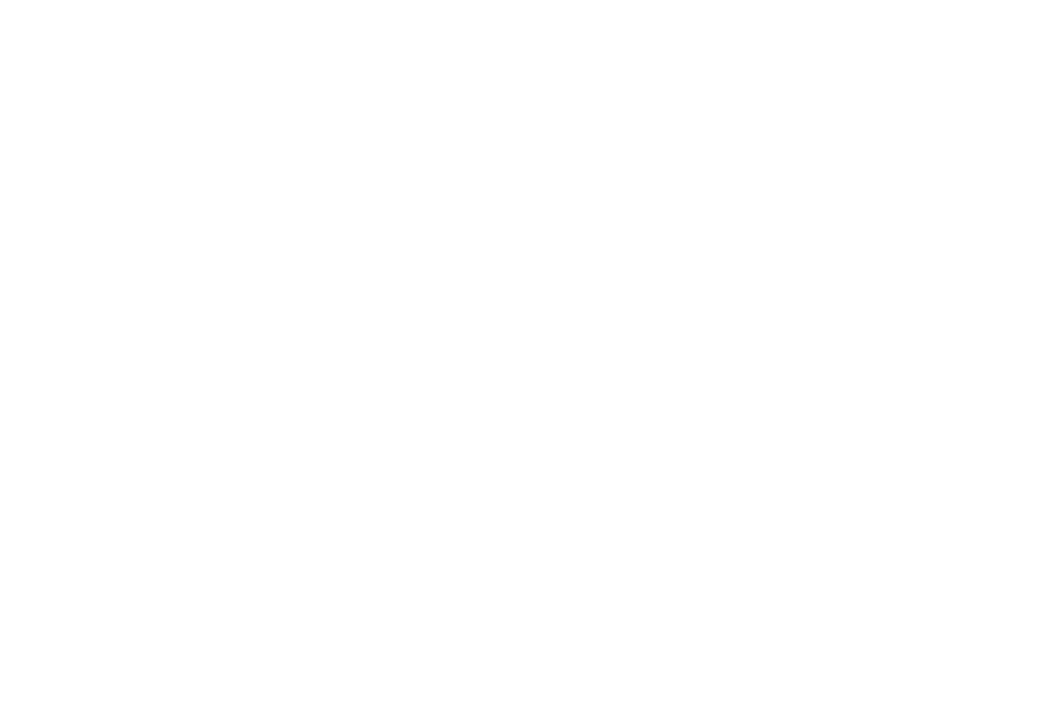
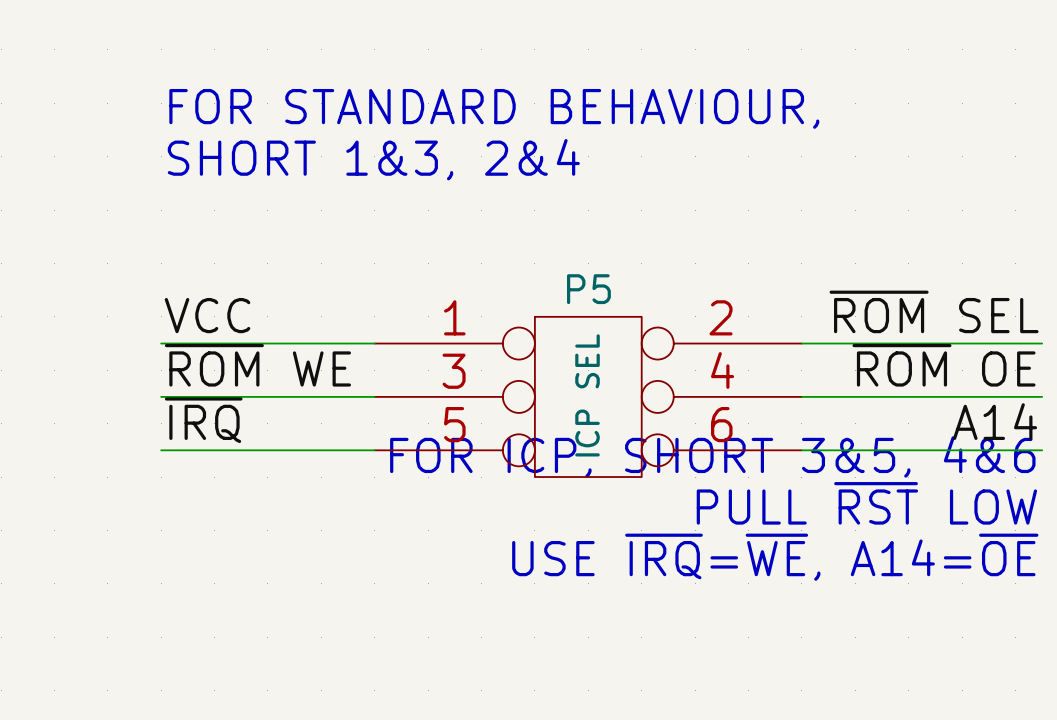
text: none -> FOR STANDARD BEHAVIOUR, (494, 108)
text: none -> SHORT 1&3, 2&4 (373, 159)
label: none -> ~{ROM} SEL (934, 311)
label: none -> VCC (207, 315)
wire: none -> (161, 343) (374, 343)
wire: none -> (801, 343) (1042, 343)
label: none -> ~{ROM} WE (257, 365)
label: none -> ~{ROM} OE (944, 365)
wire: none -> (161, 396) (374, 396)
P5: none -> ICP SEL (588, 396)
wire: none -> (801, 396) (1042, 396)
label: none -> ~{IRQ} (203, 420)
label: none -> A14 (995, 421)
wire: none -> (161, 450) (374, 450)
wire: none -> (801, 450) (1042, 450)
text: none -> FOR ICP, SHORT 3&5, 4&6 (712, 456)
text: none -> PULL ~{RST} LOW (866, 503)
text: none -> USE ~{IRQ}=~{WE}, A14=~{OE} (775, 557)

